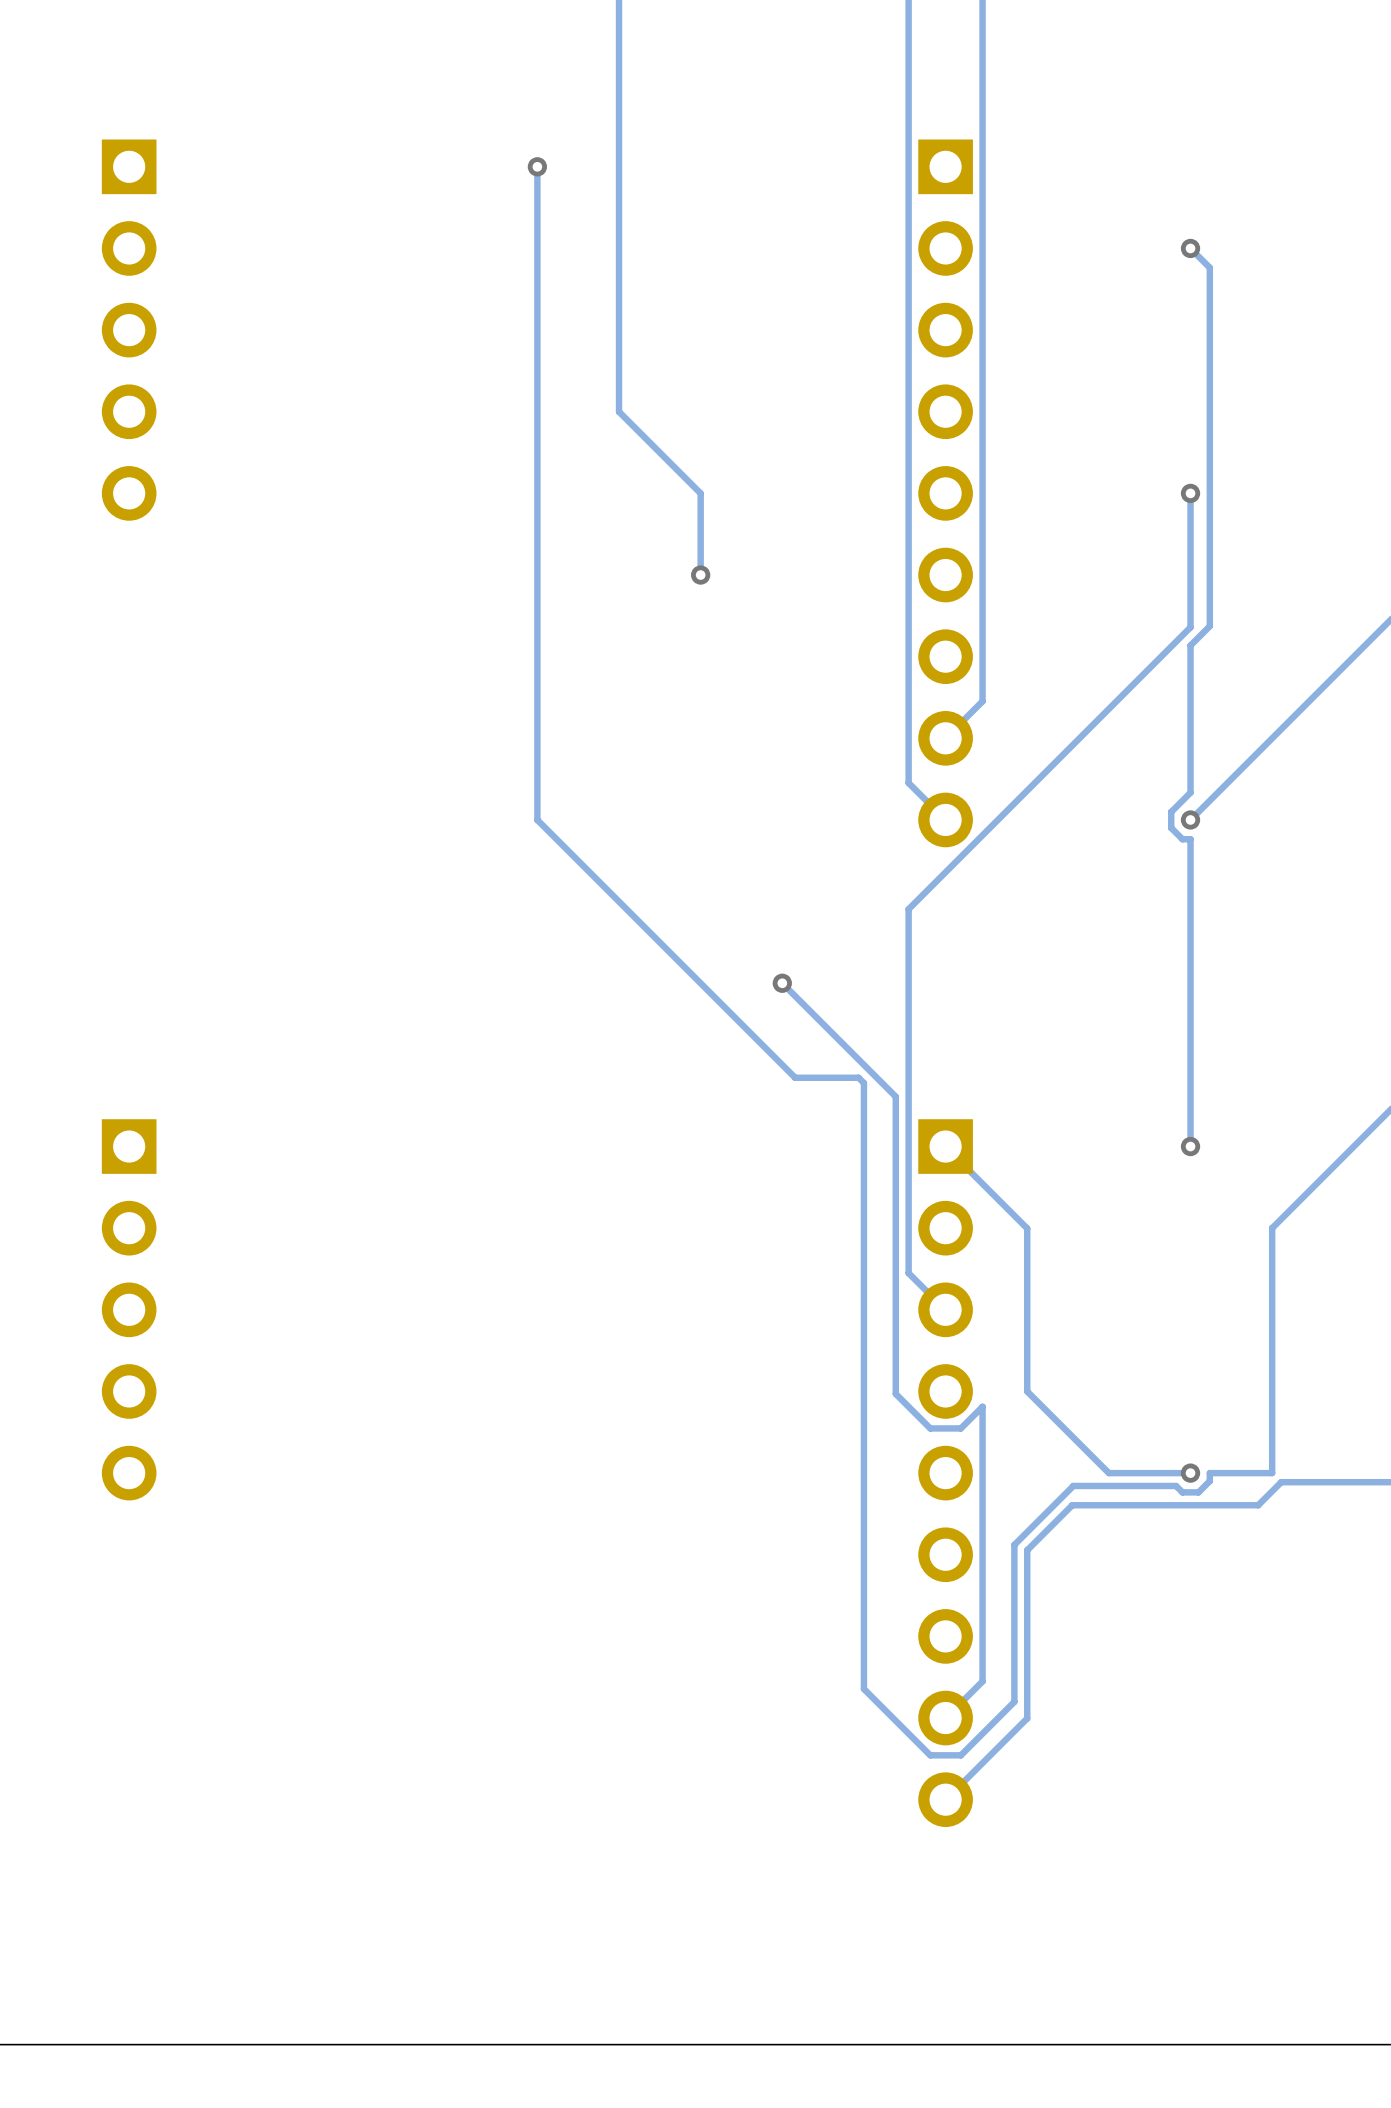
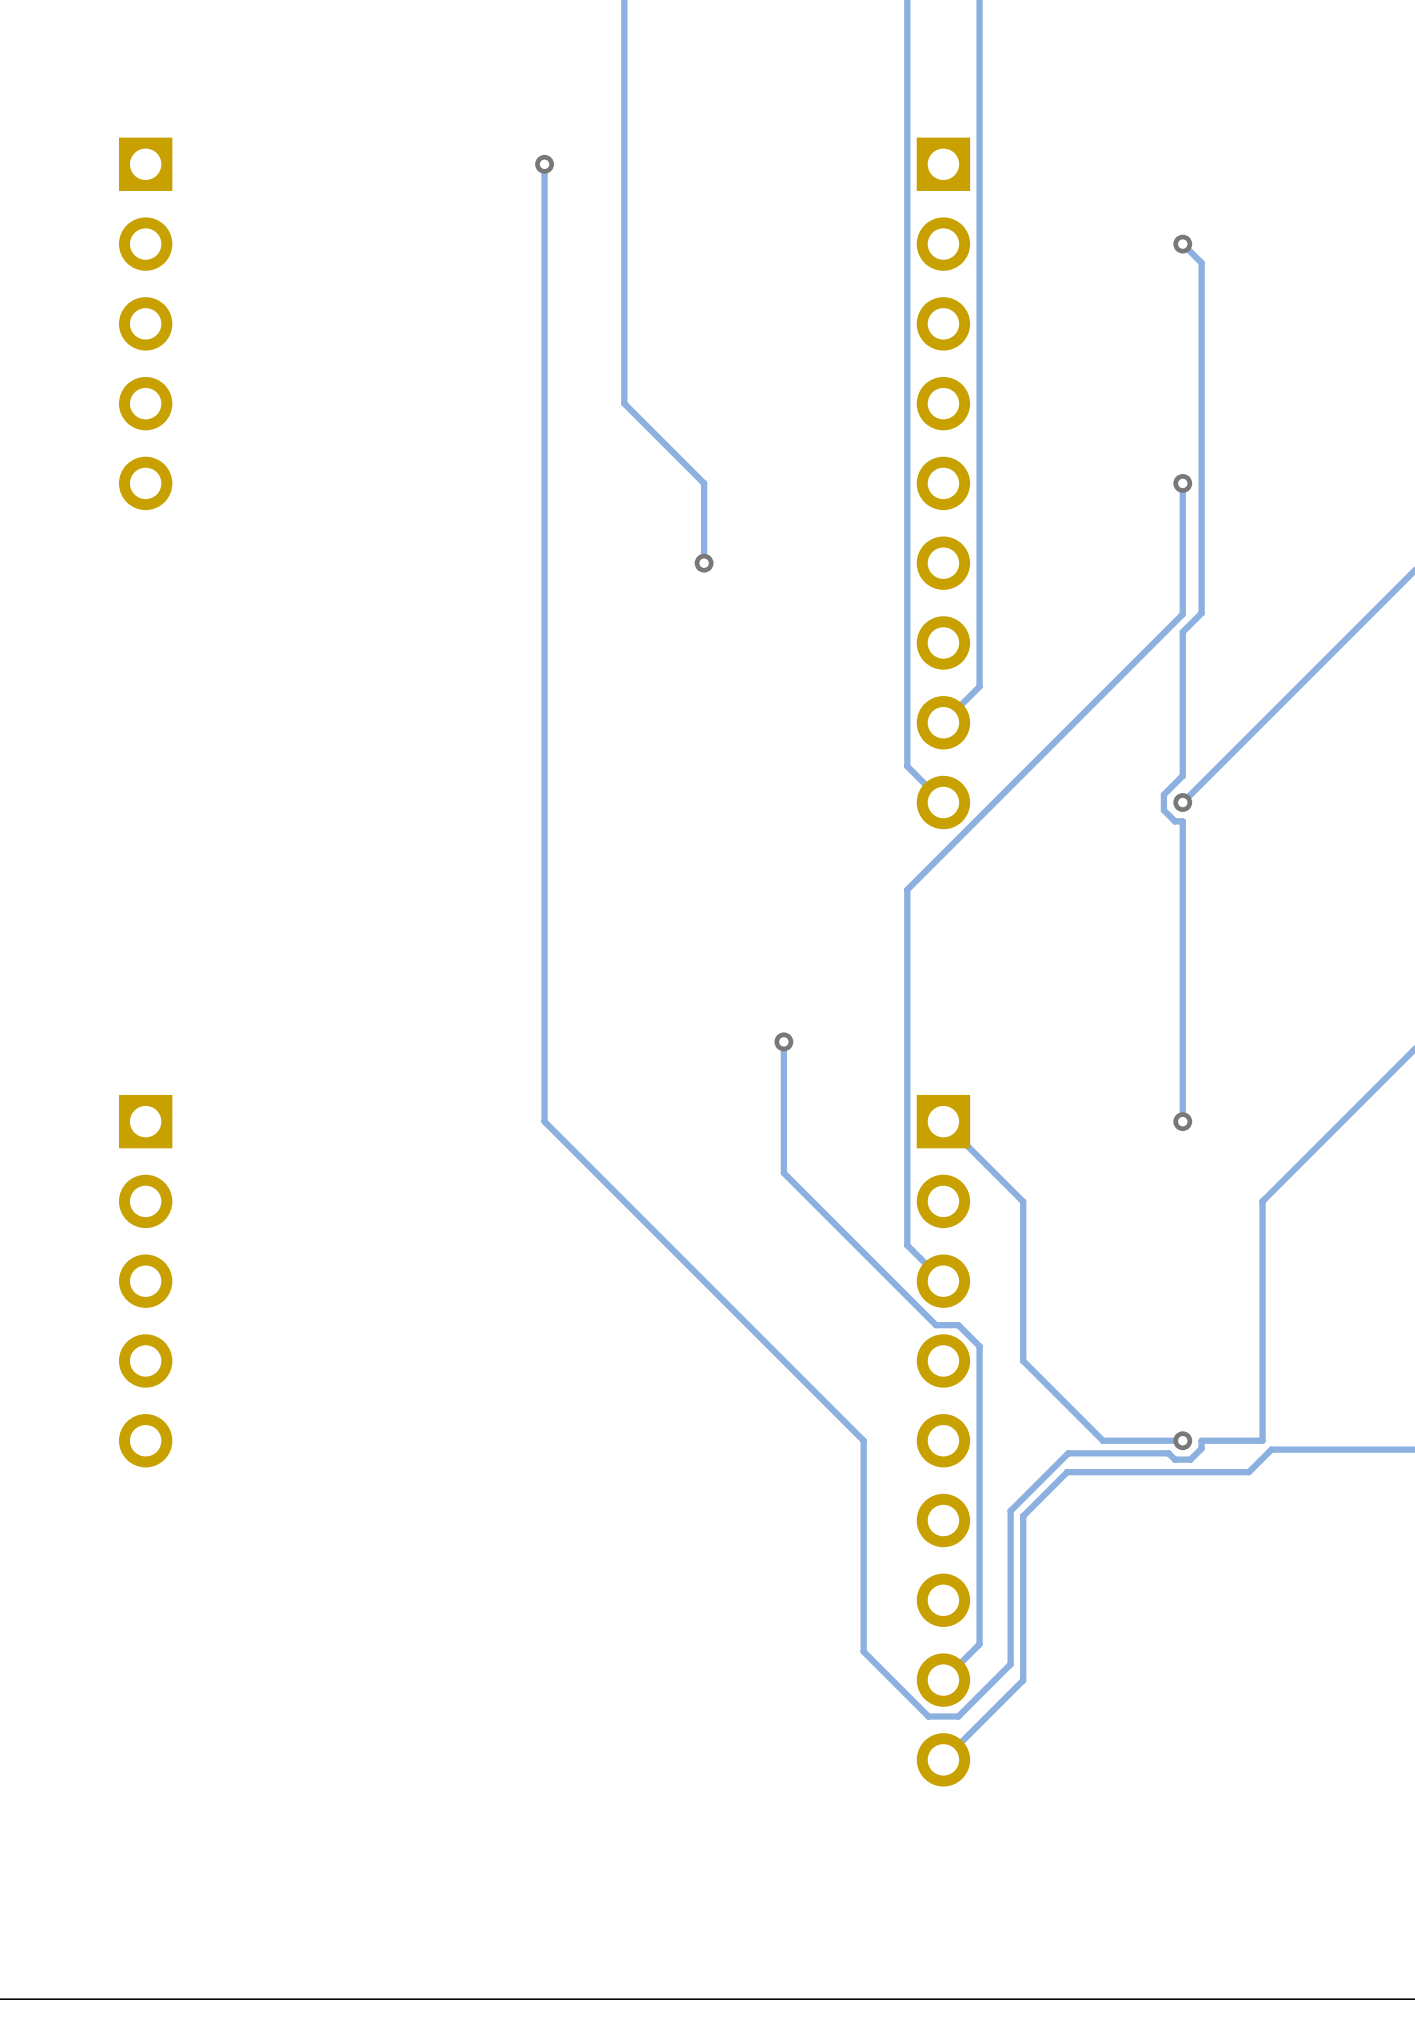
track: (537, 819) (795, 1077) (858, 1077) (863, 1083) (863, 1473) -> (544, 802) (544, 1121) (863, 1440)
track: (782, 983) (895, 1096) (895, 1393) (930, 1428) (960, 1428) (982, 1406) -> (783, 1041) (783, 1173) (936, 1325) (958, 1325) (979, 1346) (979, 1375)
via position: (782, 983) -> (783, 1041)

